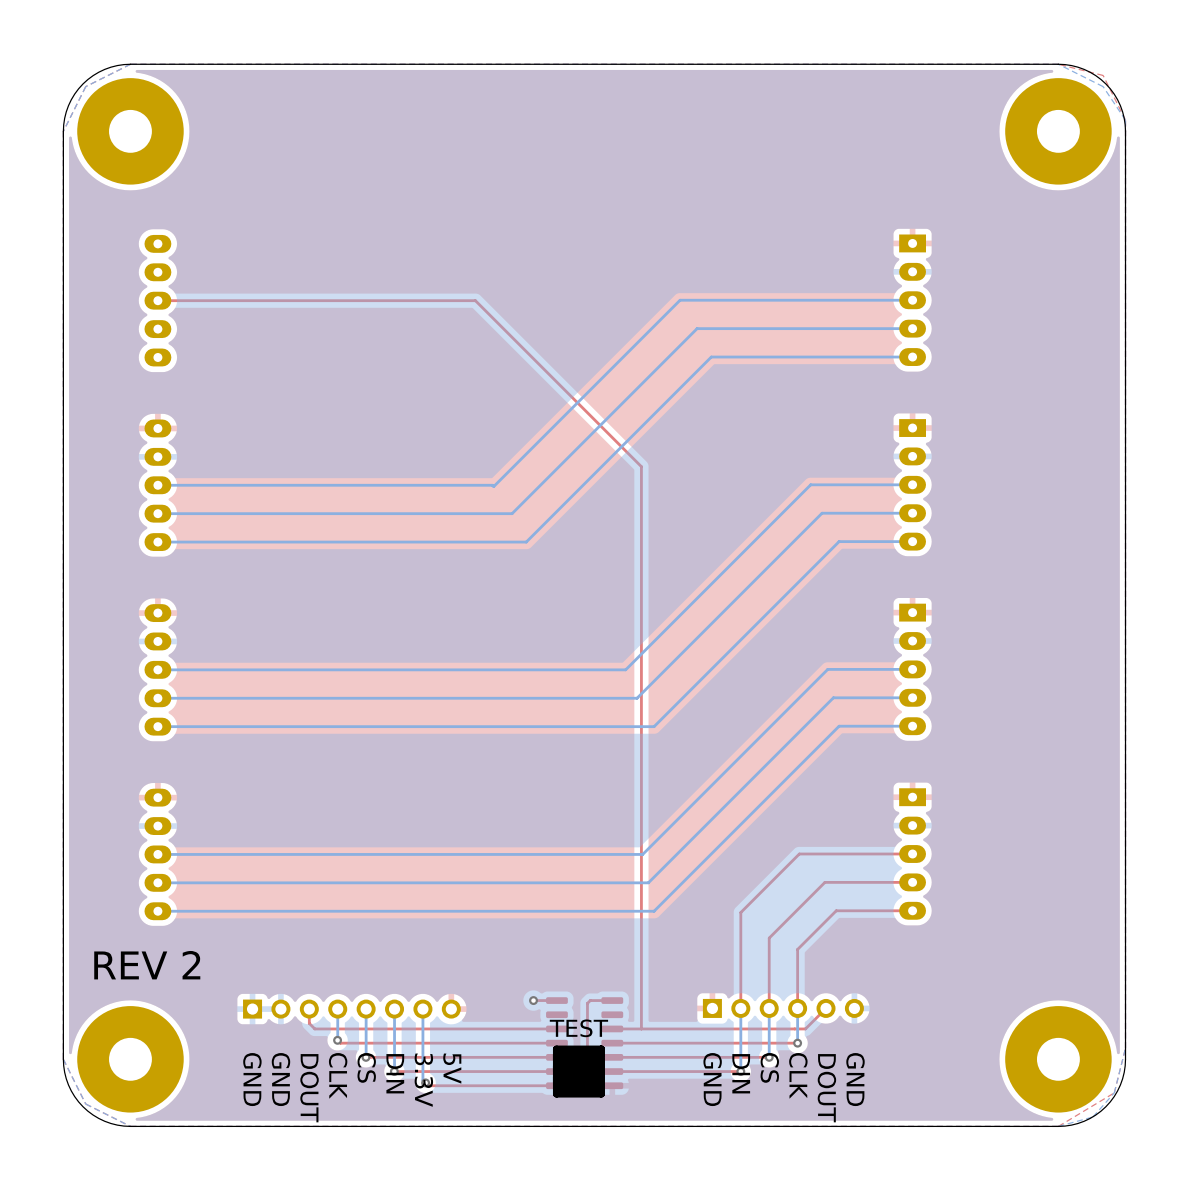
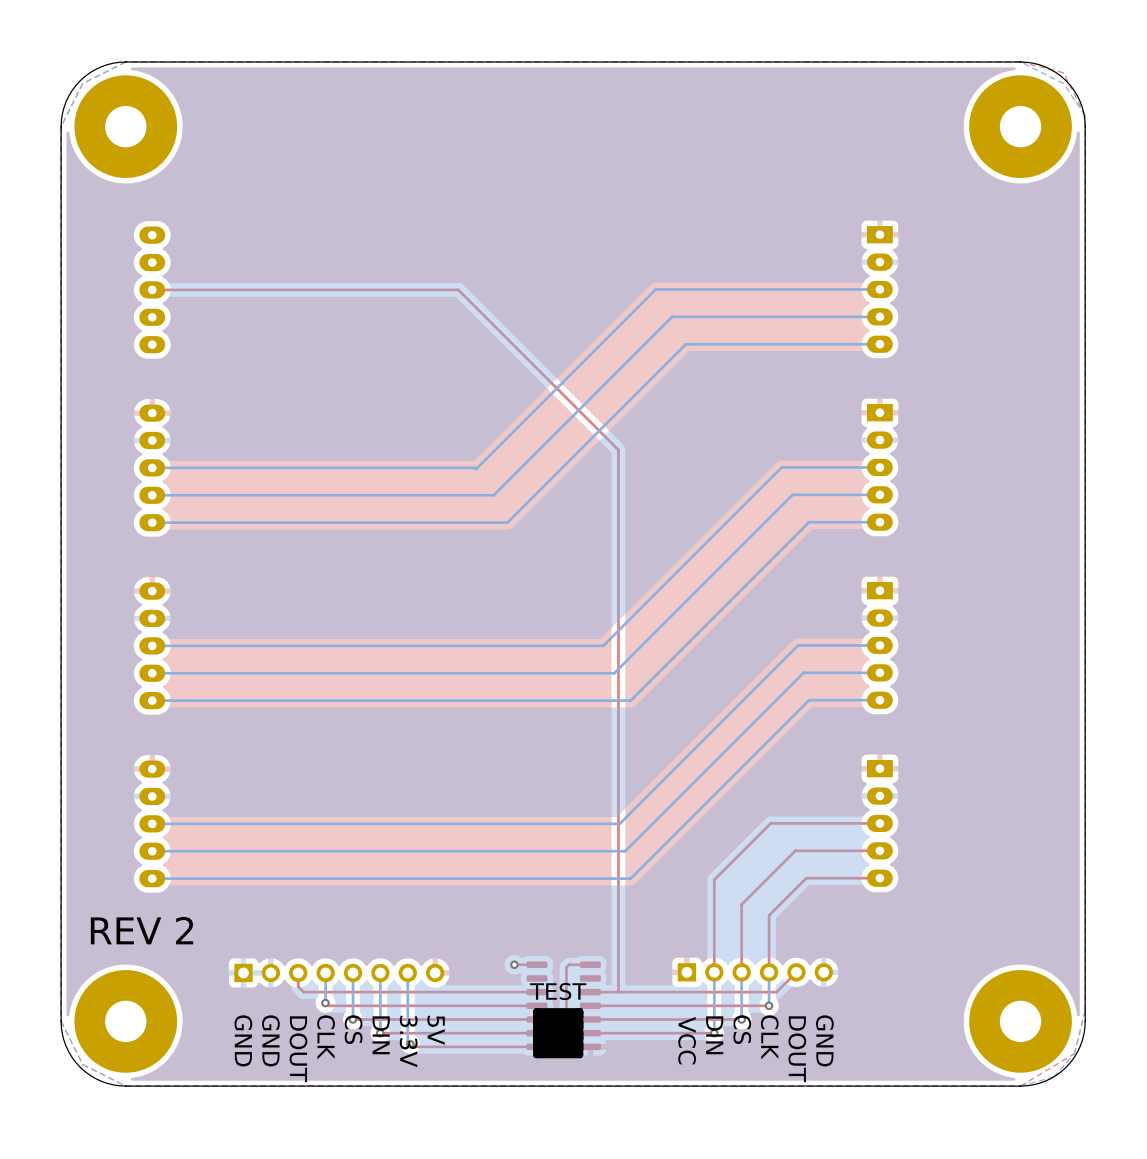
text: GND (712, 1079) -> VCC (687, 1040)

